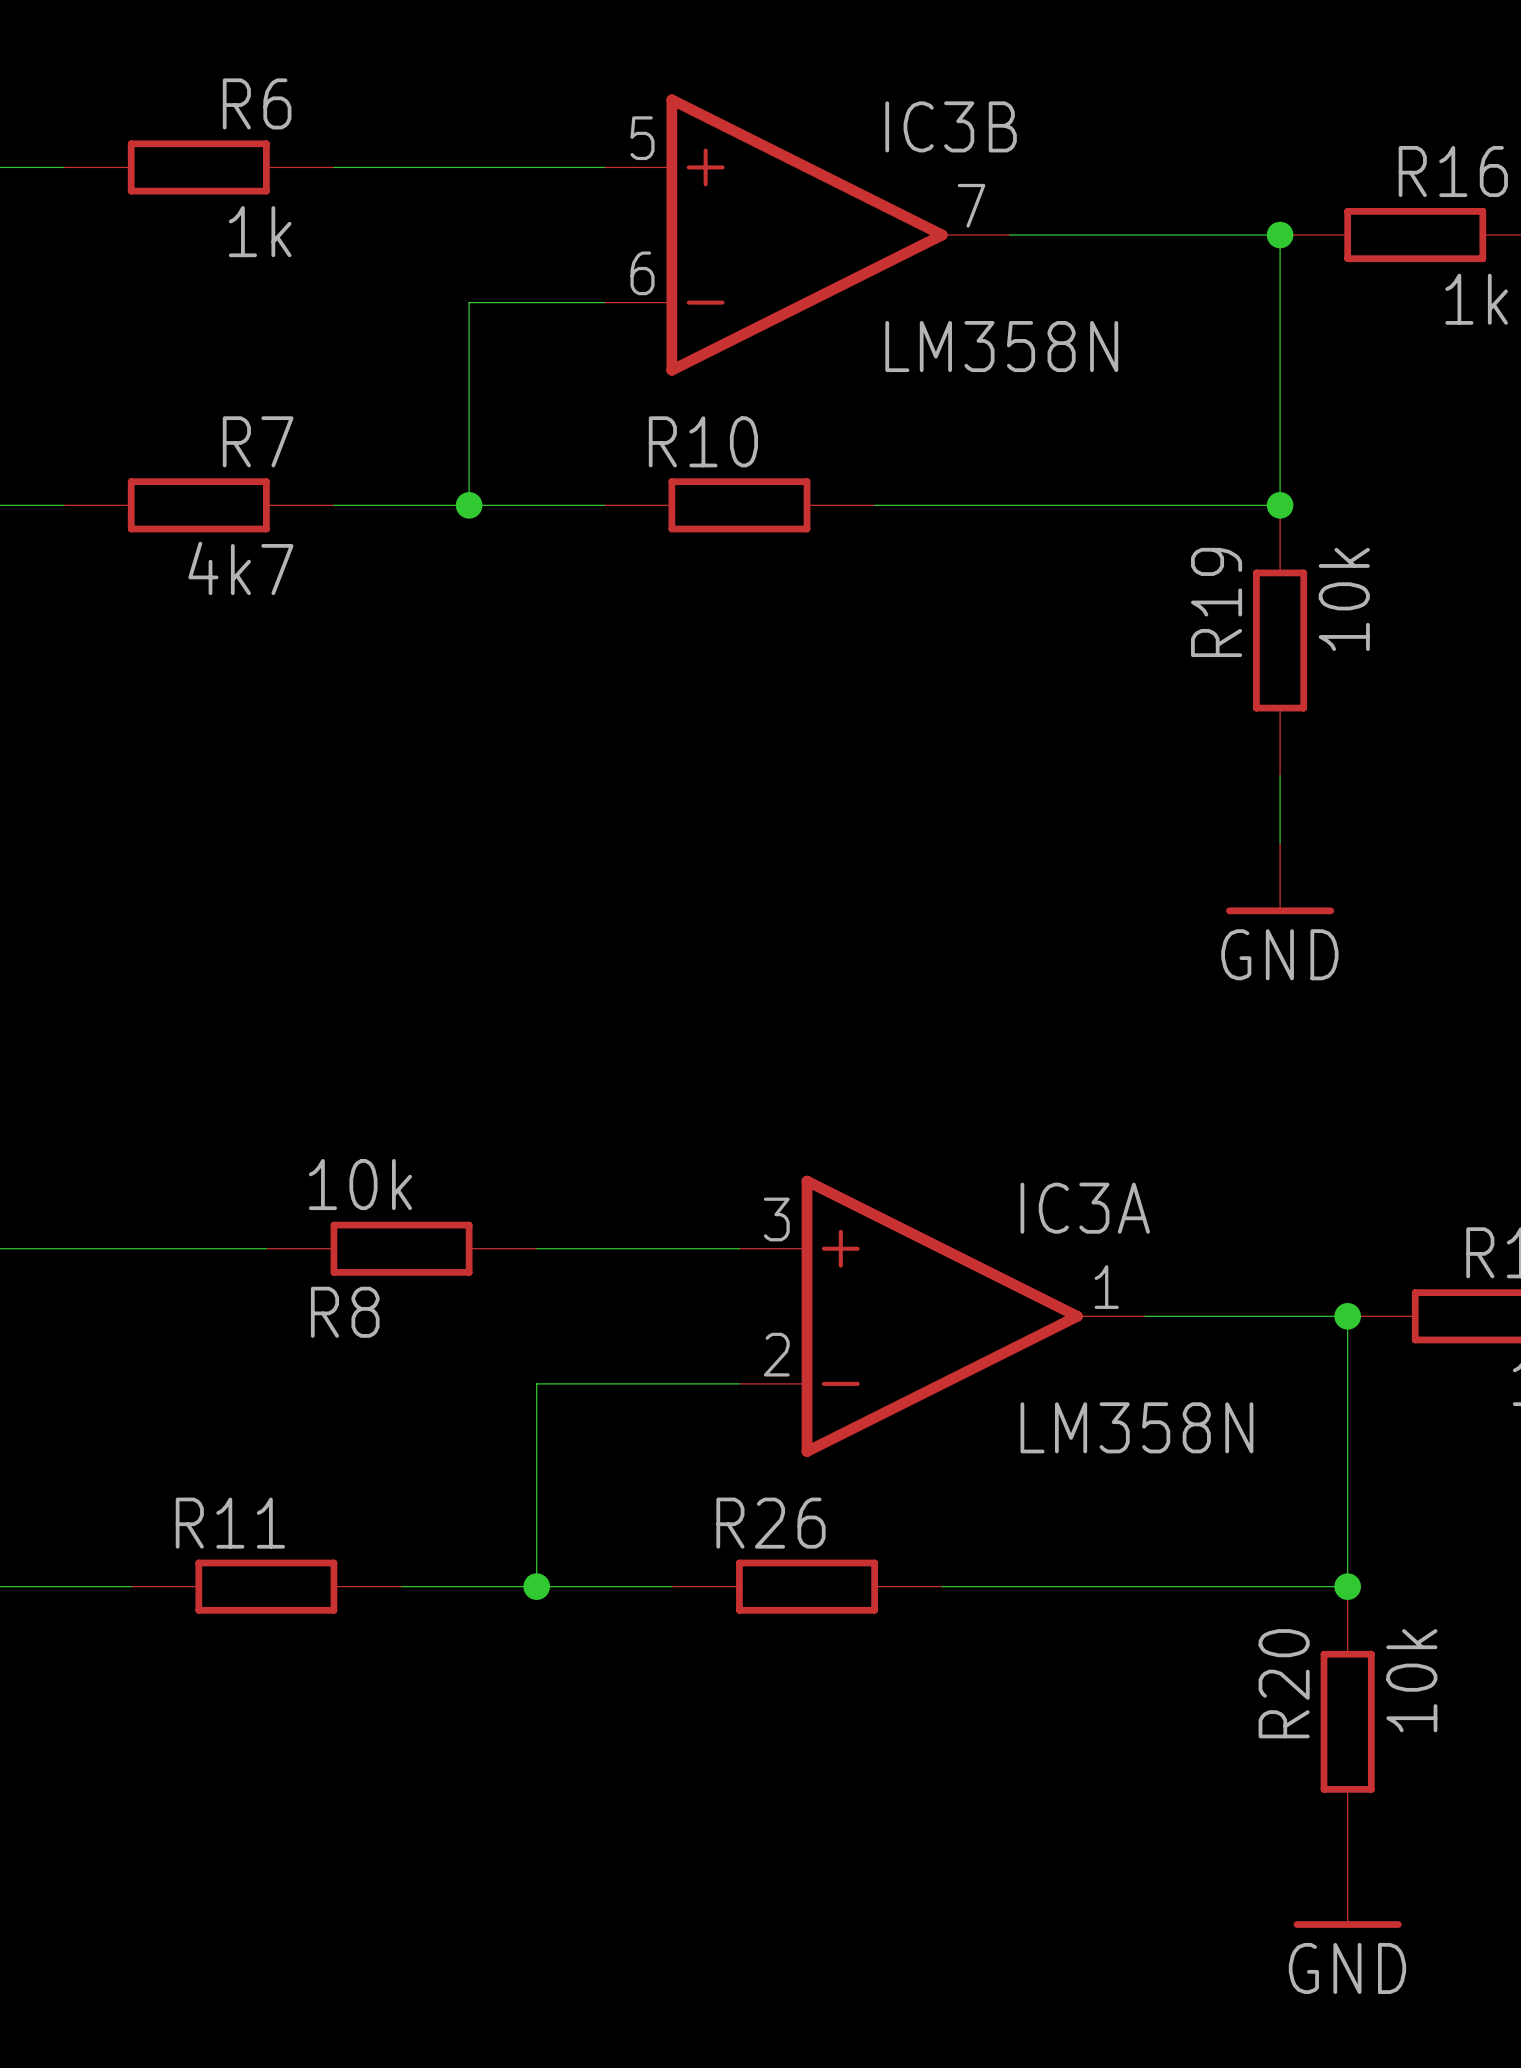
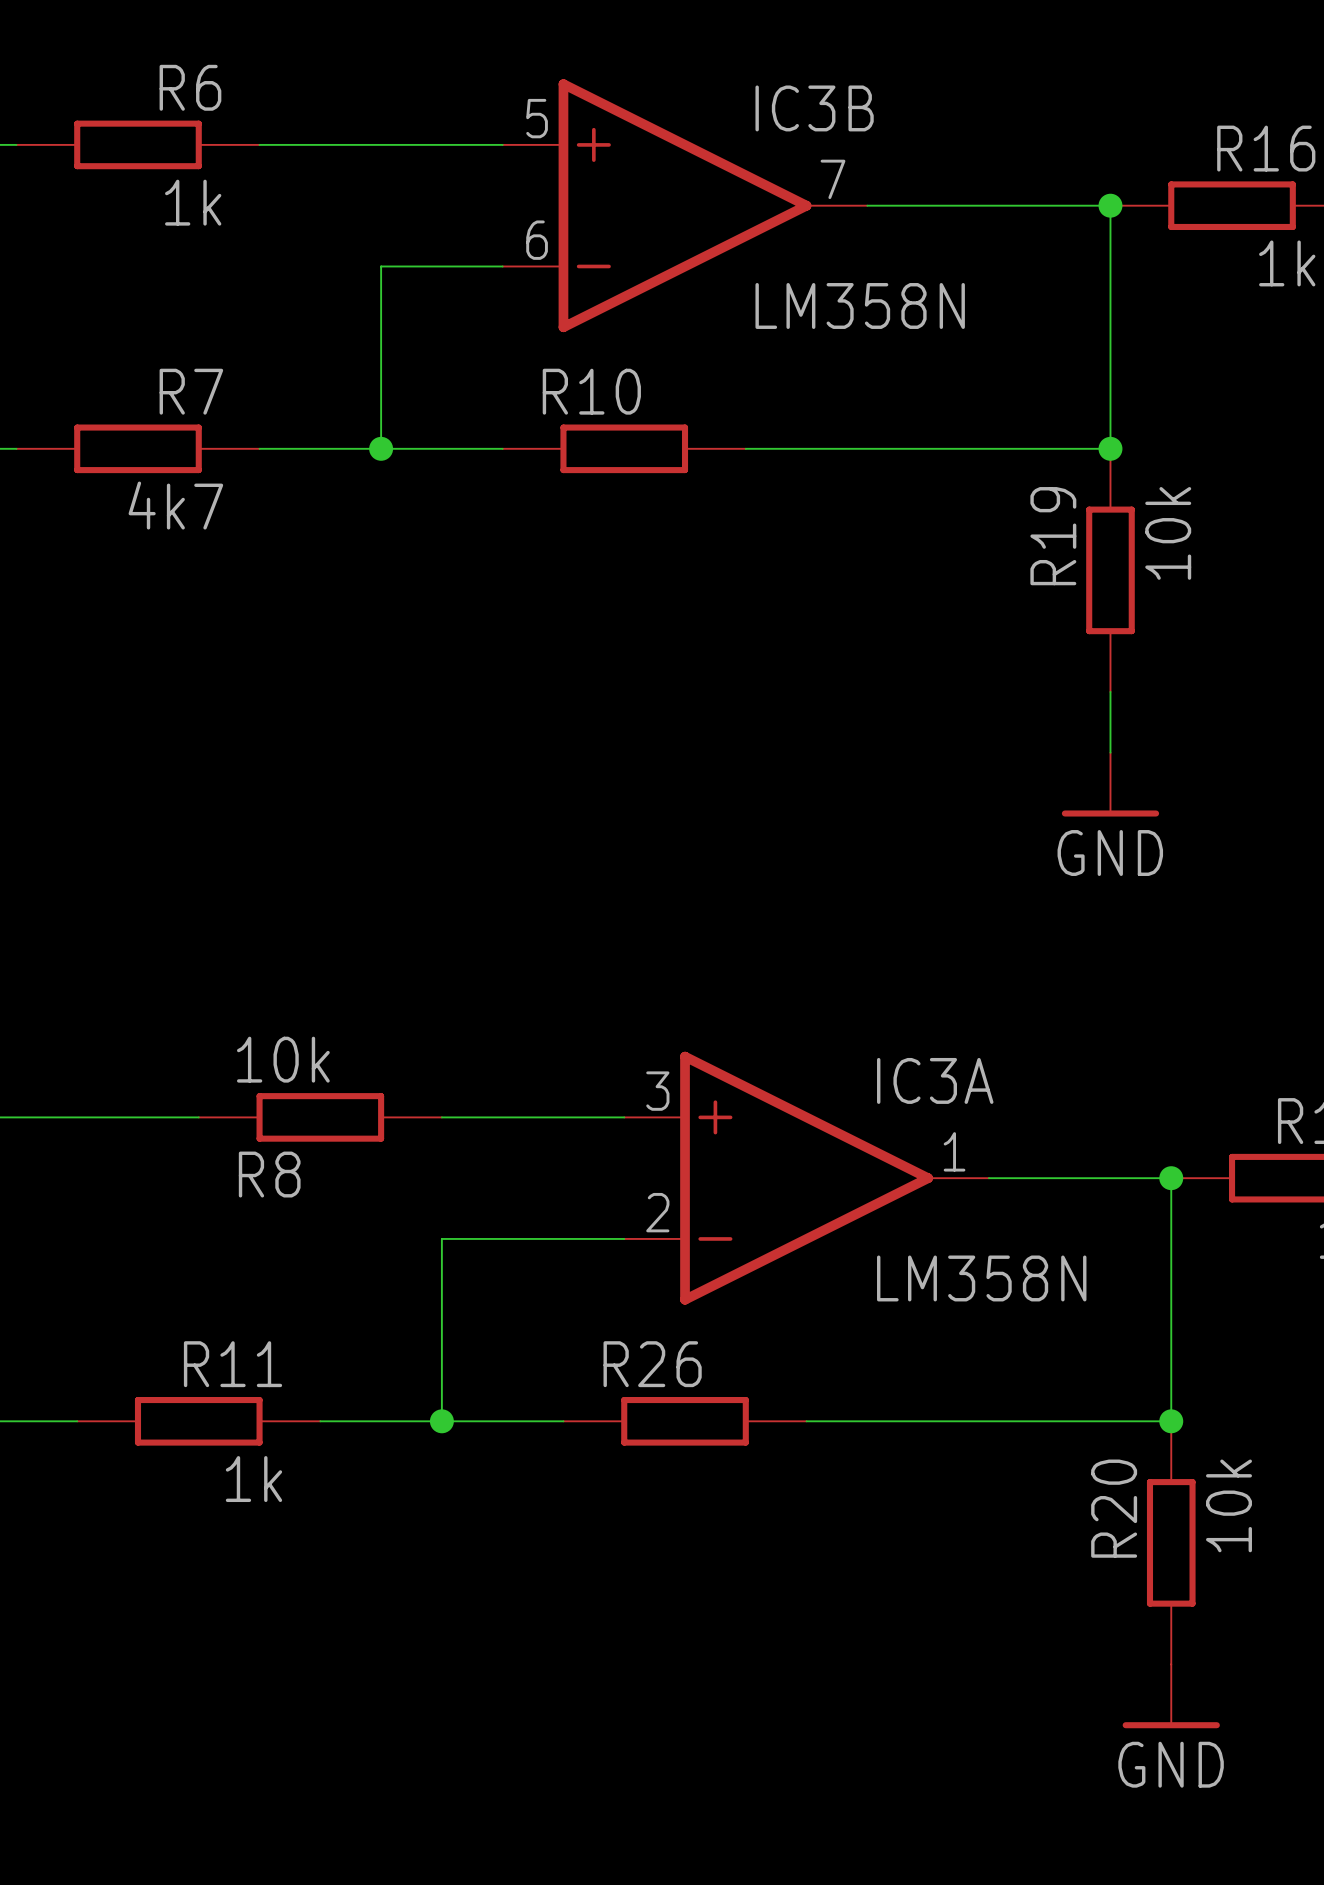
R11 name position: R11 (230, 1523) -> R11 (233, 1364)
R11 value: none -> 1k (253, 1479)

